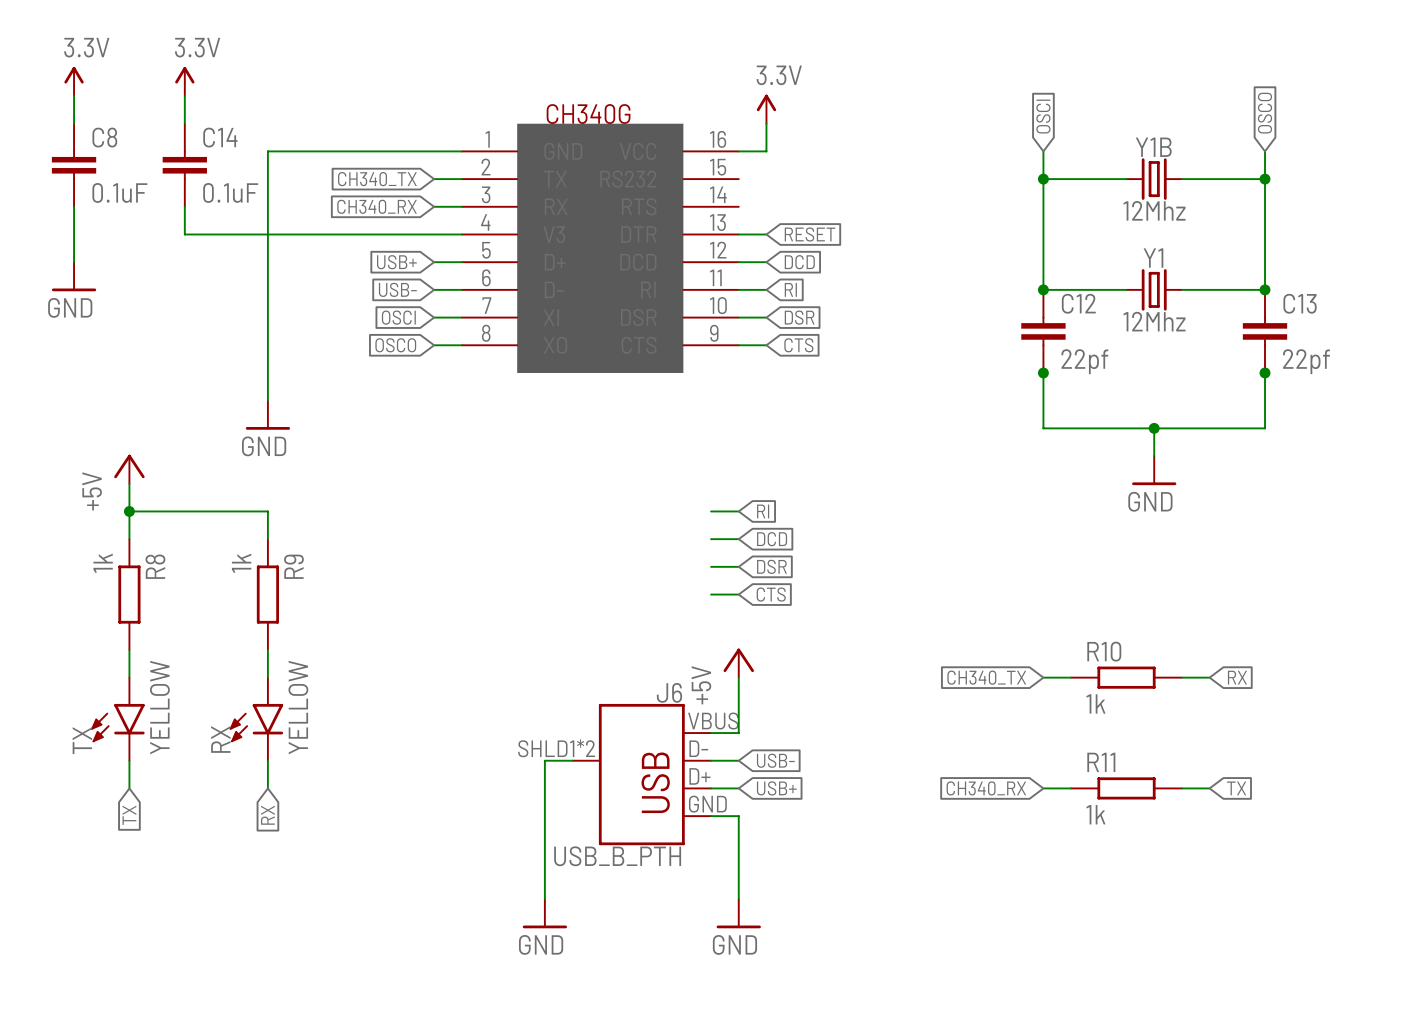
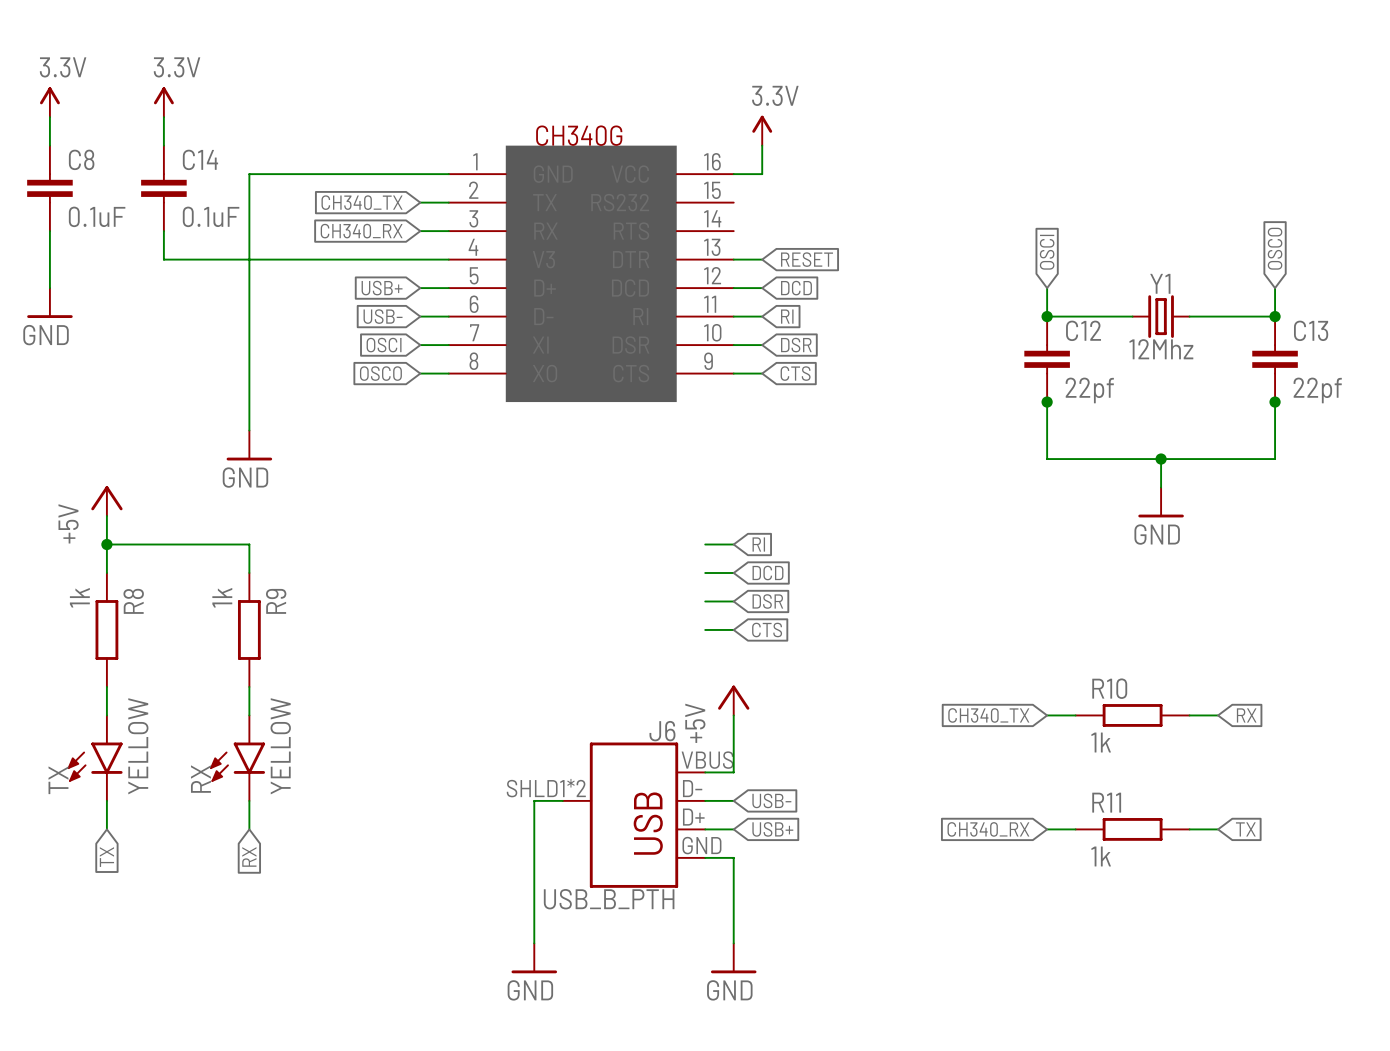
global label position: OSCO (1265, 113) -> OSCO (1275, 248)
global label position: OSCI (1043, 116) -> OSCI (1047, 252)
wire: (1043, 151) (1043, 262) -> none
wire: (1265, 151) (1265, 262) -> none
wire: (1043, 179) (1126, 179) -> none
junction: (1043, 179) -> none
Y1B: 12Mhz (1154, 179) -> none
wire: (1181, 179) (1265, 179) -> none
junction: (1265, 179) -> none

